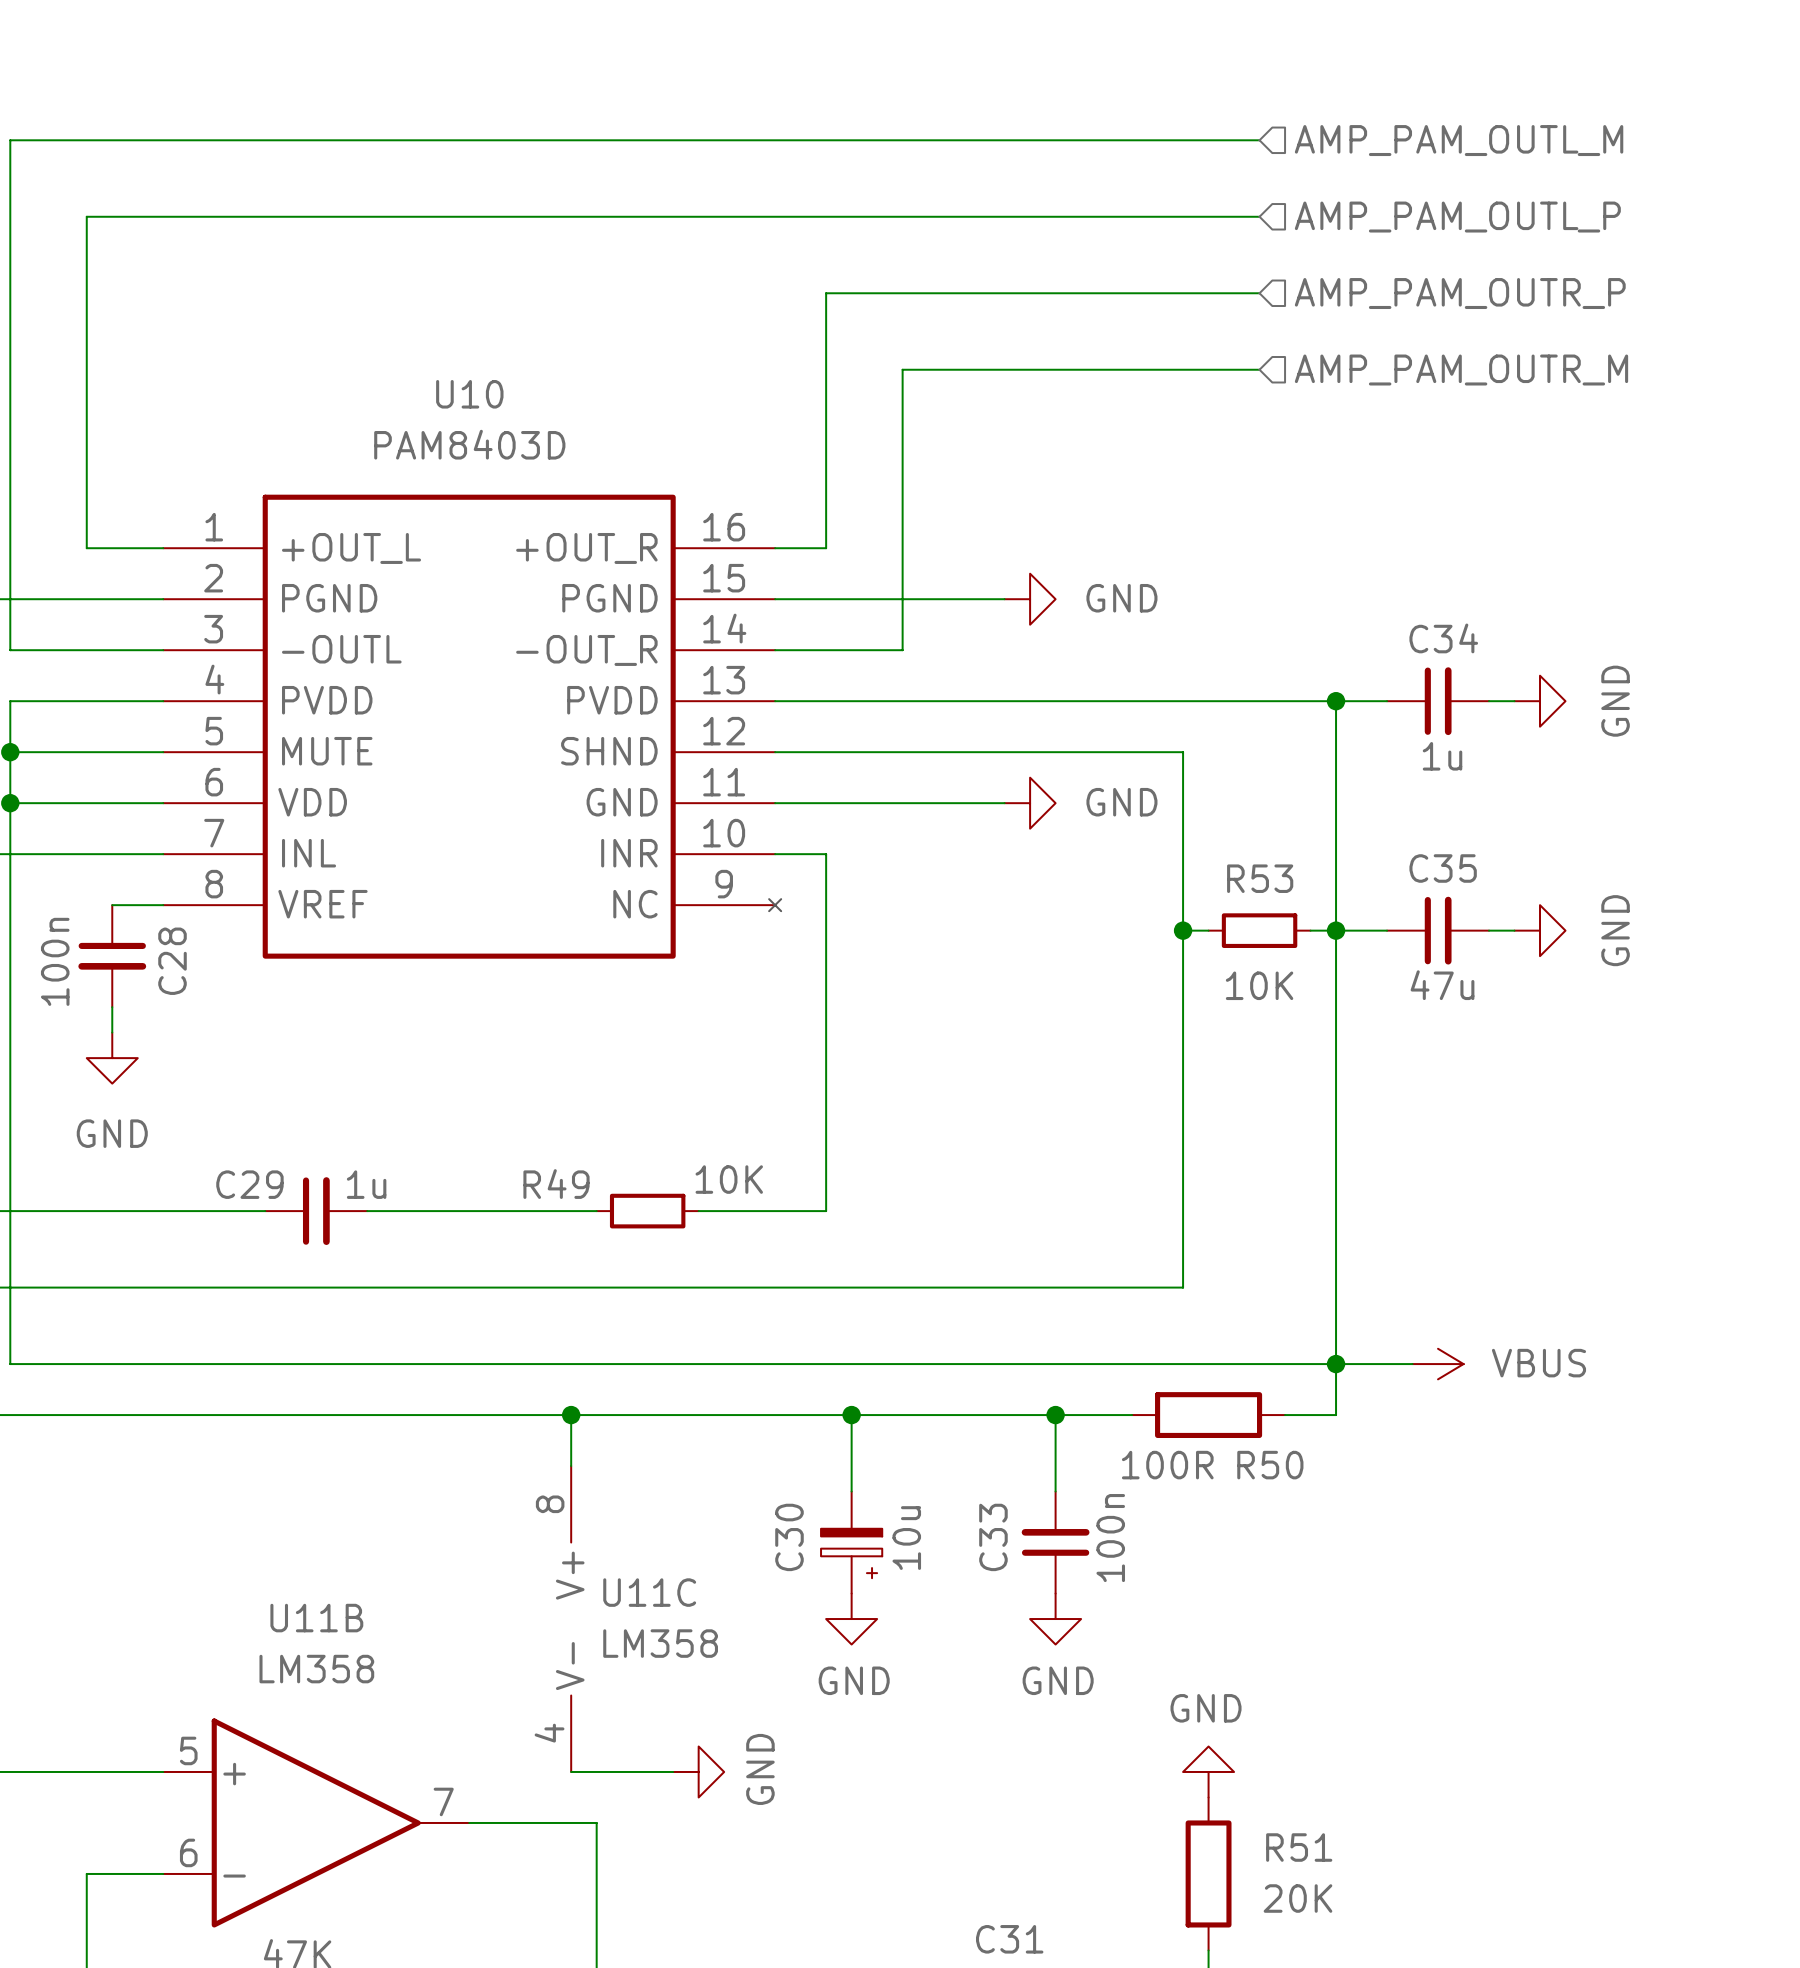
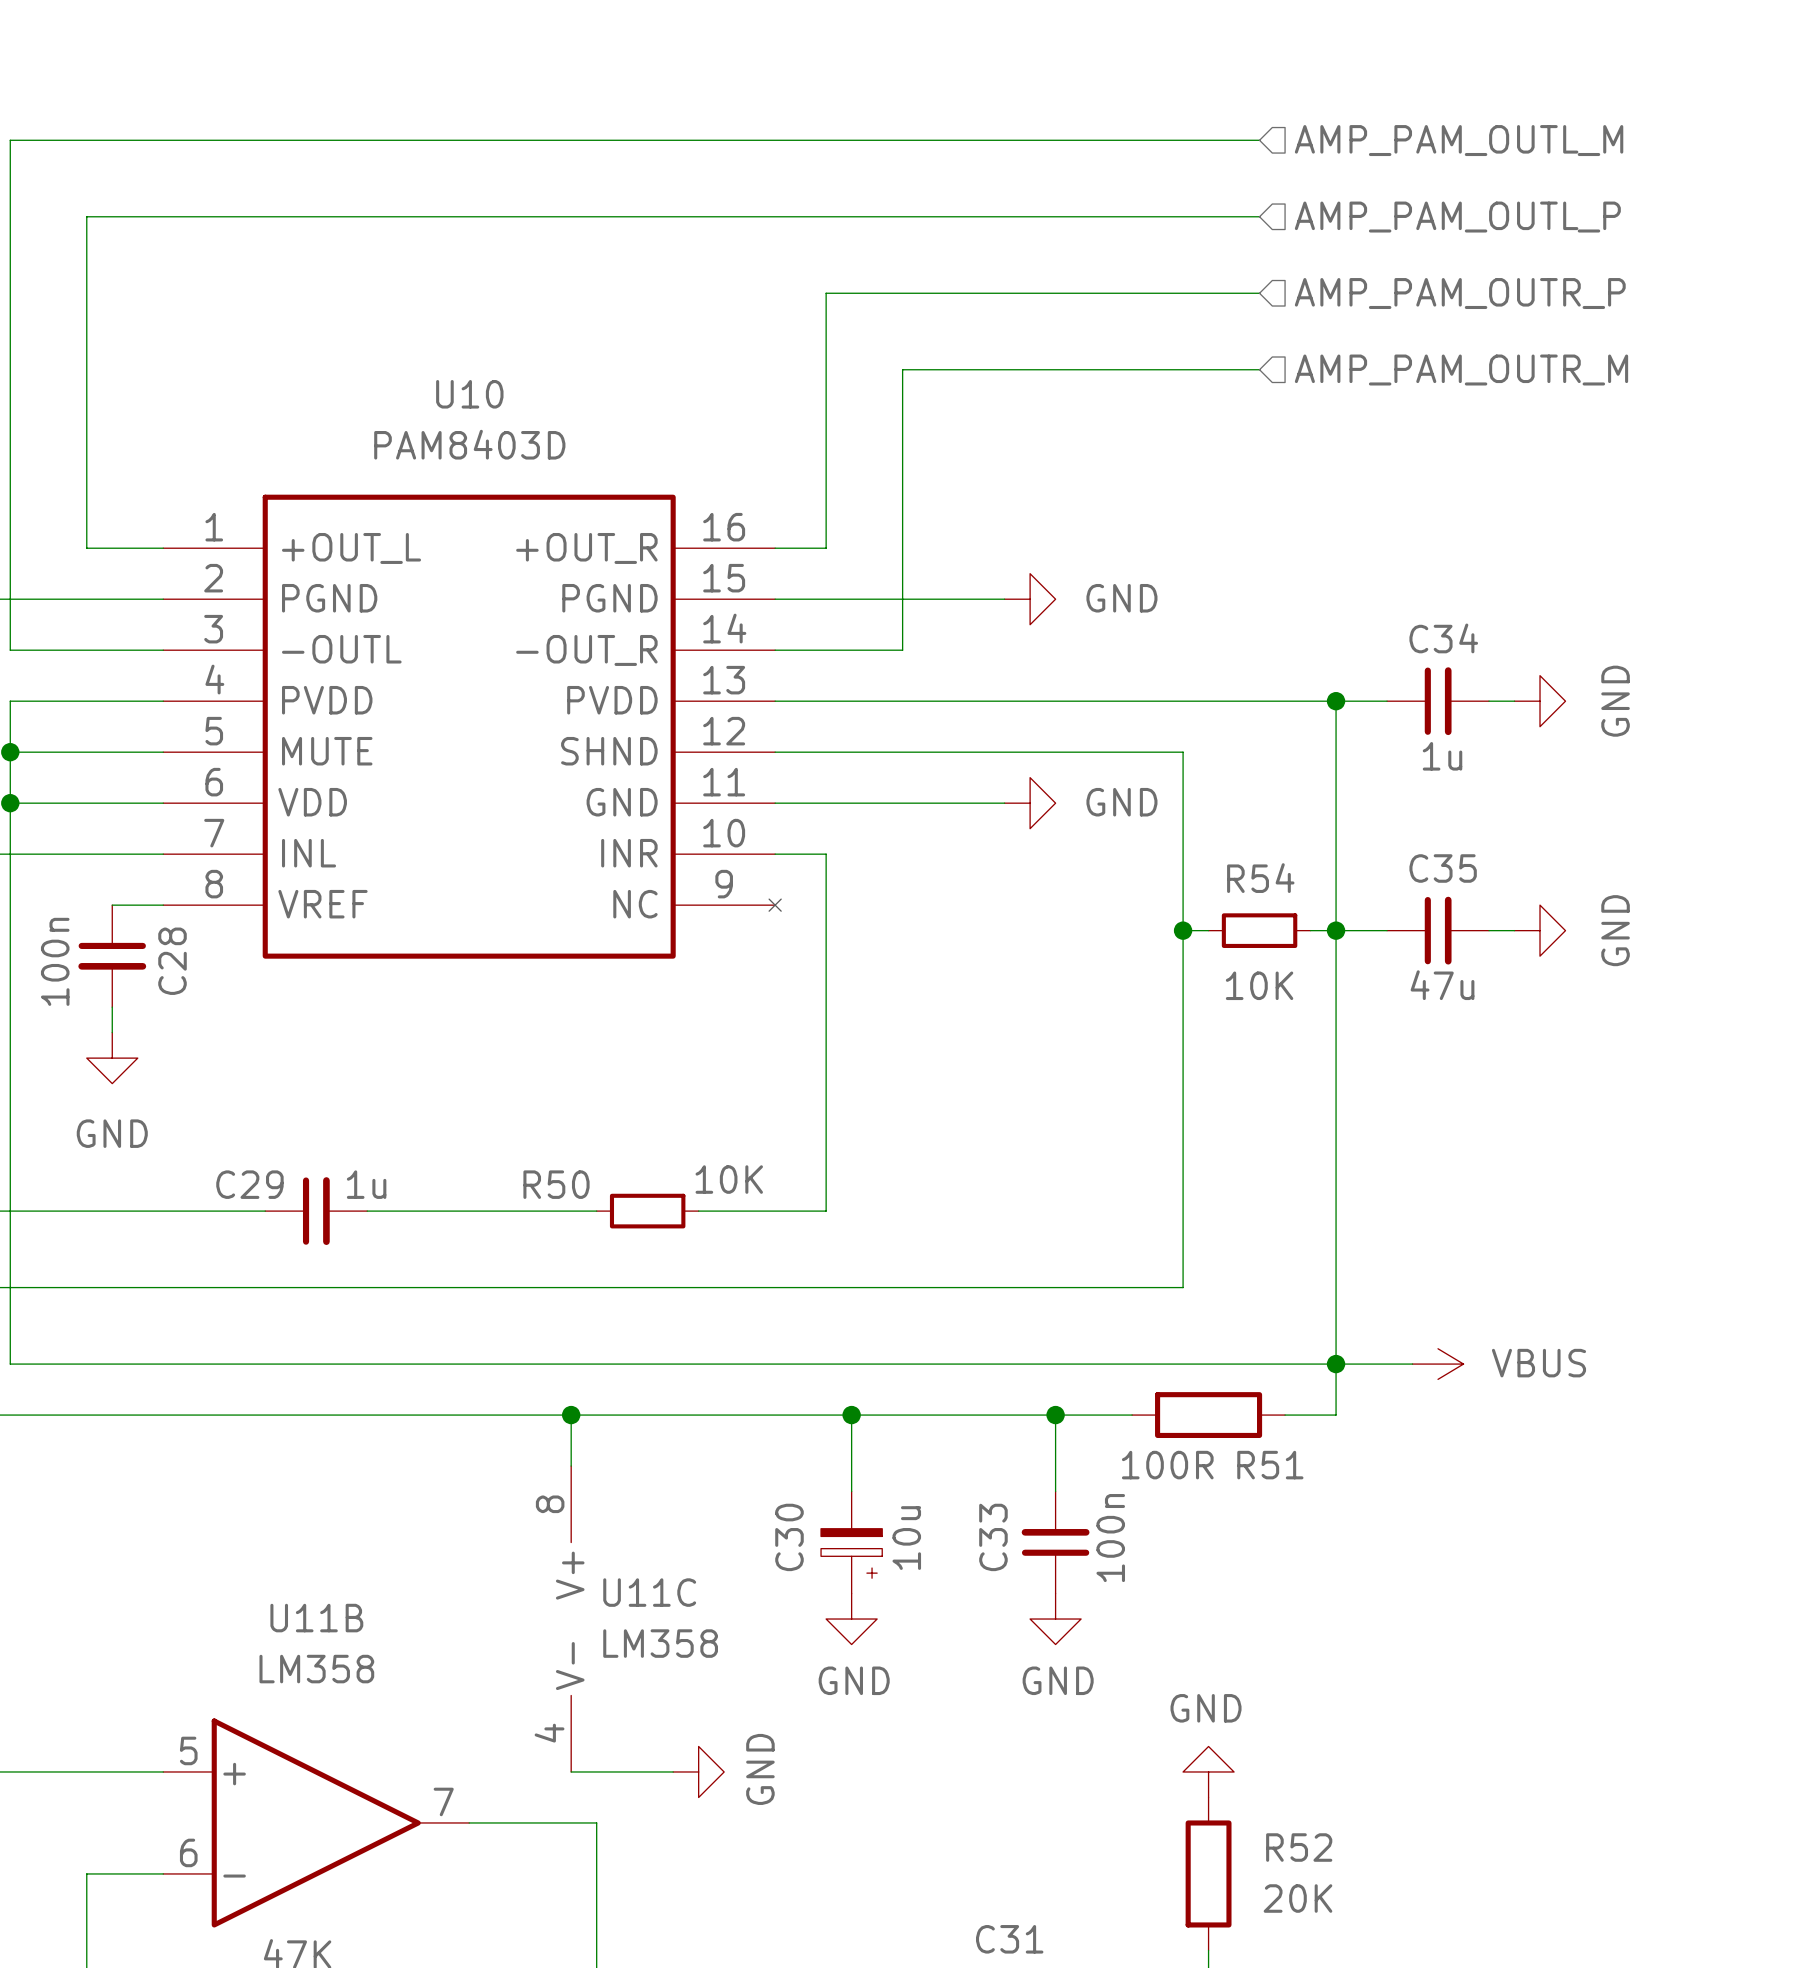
R53 name: R53 (1260, 878) -> R54 (1260, 878)
R49 name: R49 (556, 1184) -> R50 (556, 1184)
R50 name: R50 (1270, 1465) -> R51 (1270, 1465)
R51 name: R51 (1299, 1847) -> R52 (1299, 1847)

